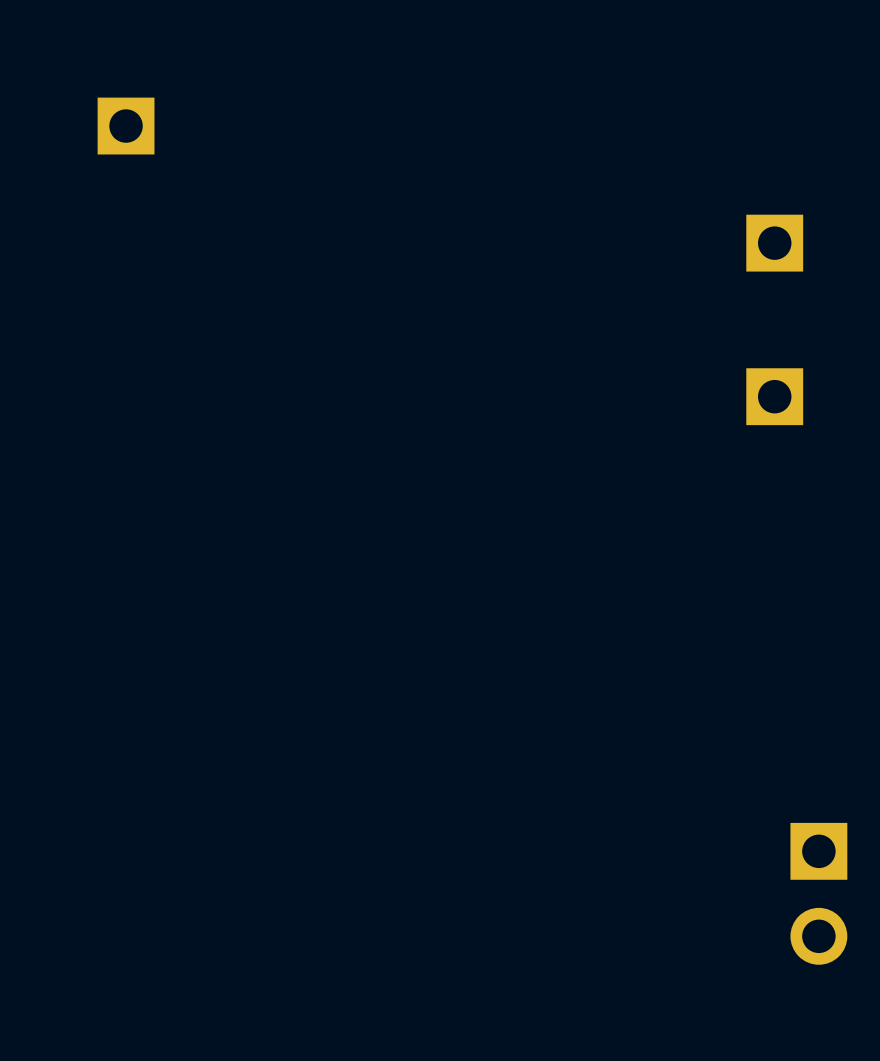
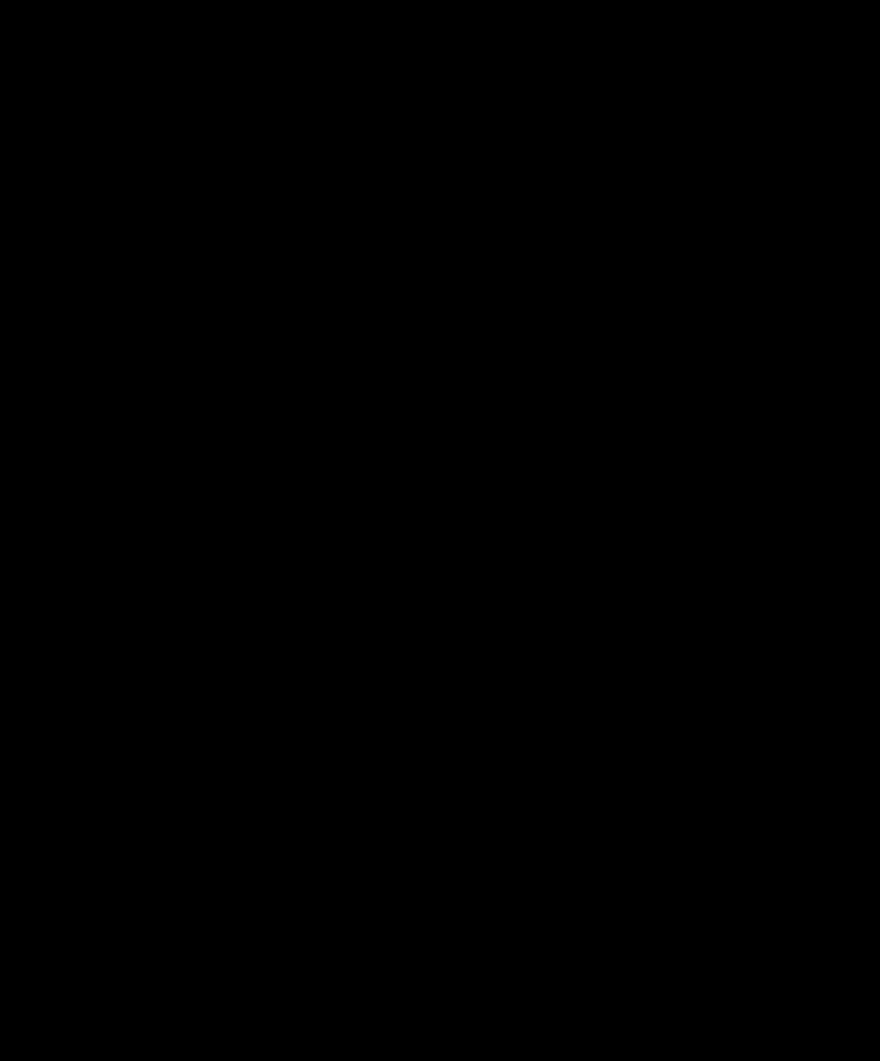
part: (126, 126) -> none
part: (774, 243) -> none
part: (774, 396) -> none
part: (818, 893) -> none

